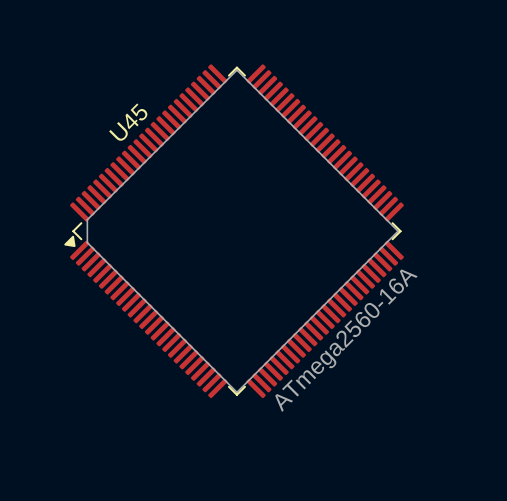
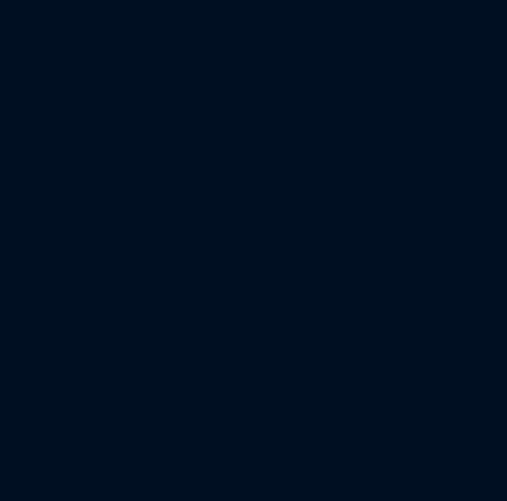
U45: ATmega2560-16A (234, 231) -> none

